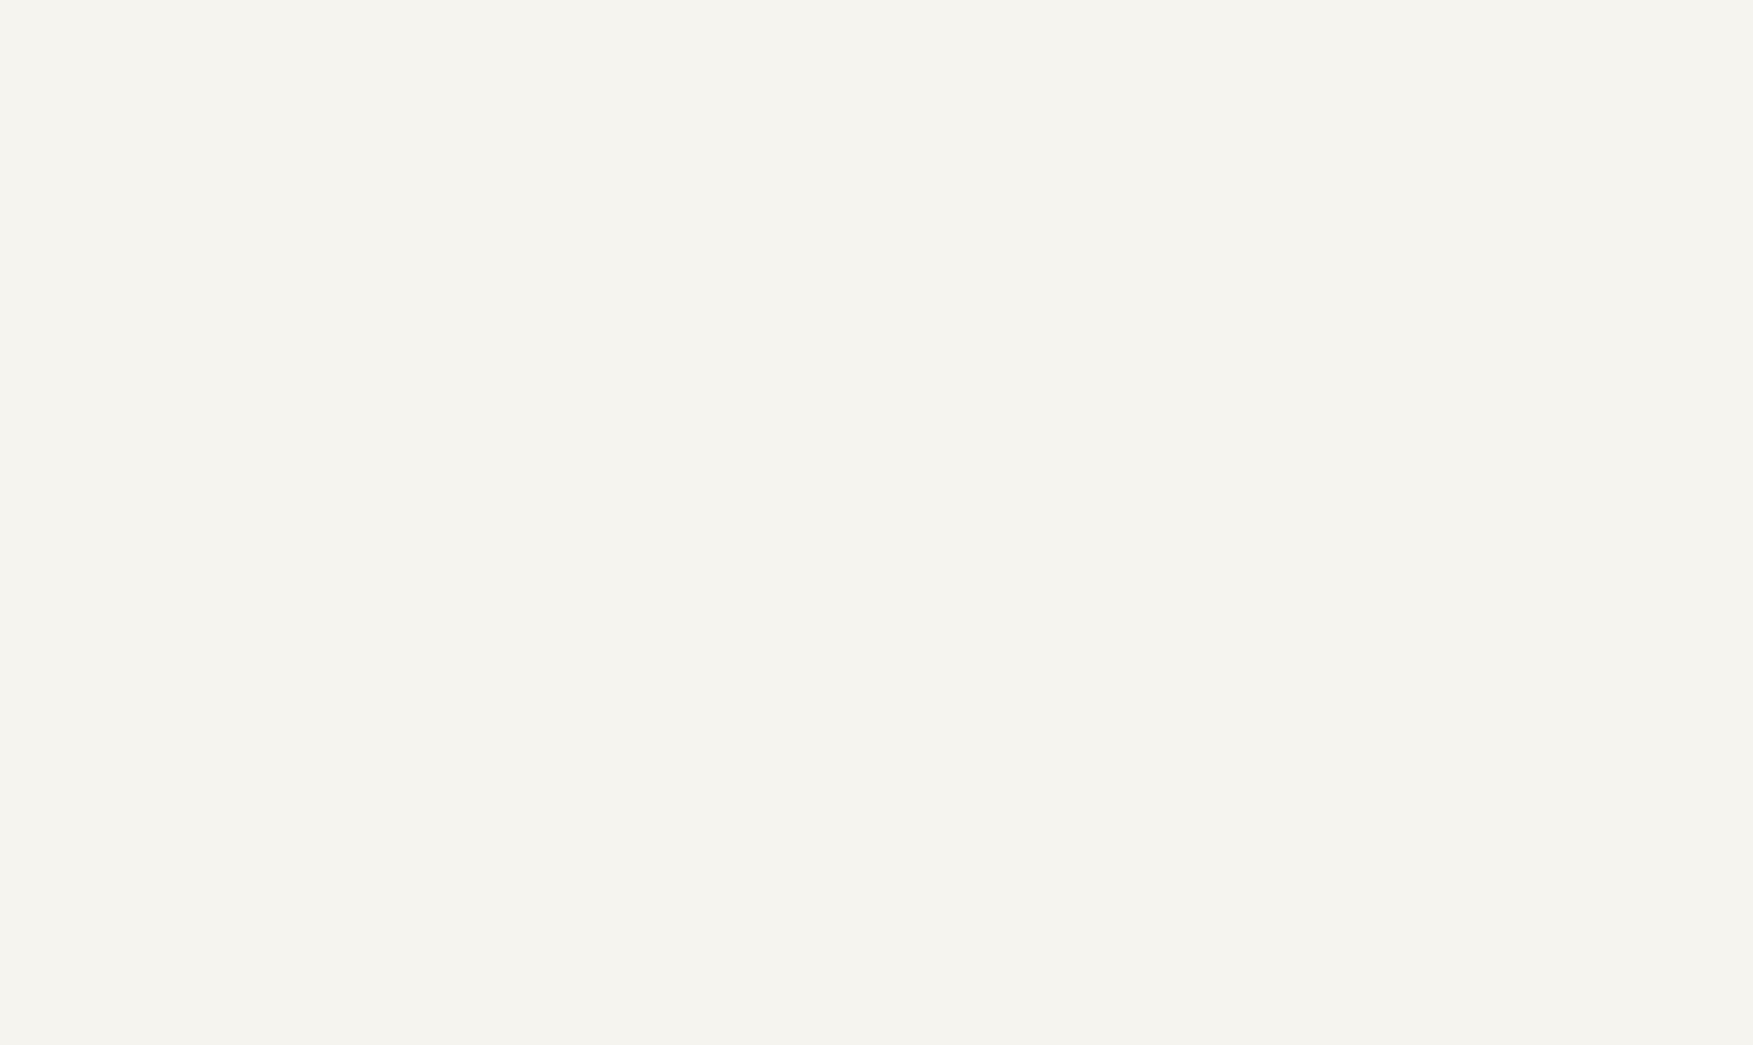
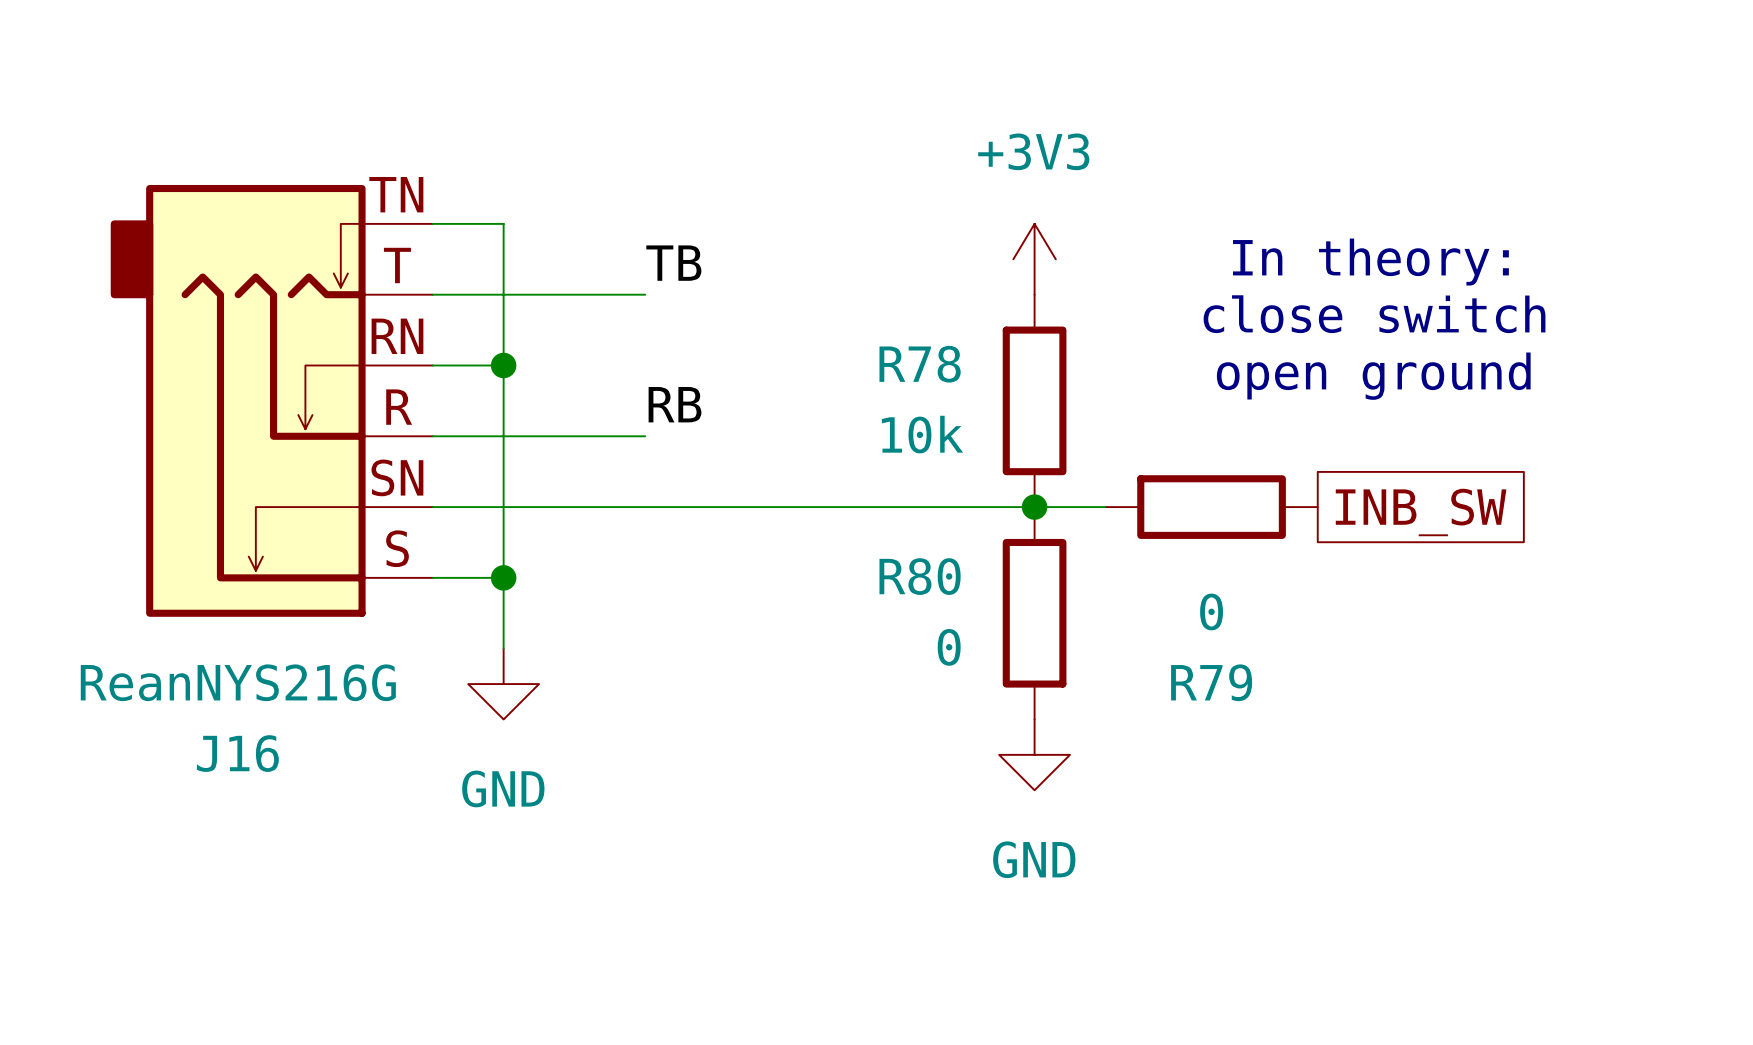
wire: none -> (432, 223) (503, 223) (503, 648)
power symbol: none -> +3V3 (1034, 259)
text: none -> In theory: (1370, 262)
label: none -> TB (673, 263)
wire: none -> (432, 294) (645, 294)
text: none -> close switch (1374, 314)
wire: none -> (432, 365) (503, 365)
junction: none -> (503, 365)
text: none -> open ground (1373, 376)
J16: none -> ReanNYS216G (271, 400)
R78: none -> 10k (1034, 400)
label: none -> RB (675, 404)
wire: none -> (432, 436) (645, 436)
wire: none -> (432, 507) (1105, 507)
junction: none -> (1034, 507)
R79: none -> 0 (1211, 507)
global label: none -> INB_SW (1421, 512)
wire: none -> (432, 577) (503, 577)
junction: none -> (503, 577)
R80: none -> 0 (1034, 613)
power symbol: none -> GND (503, 684)
power symbol: none -> GND (1034, 754)

